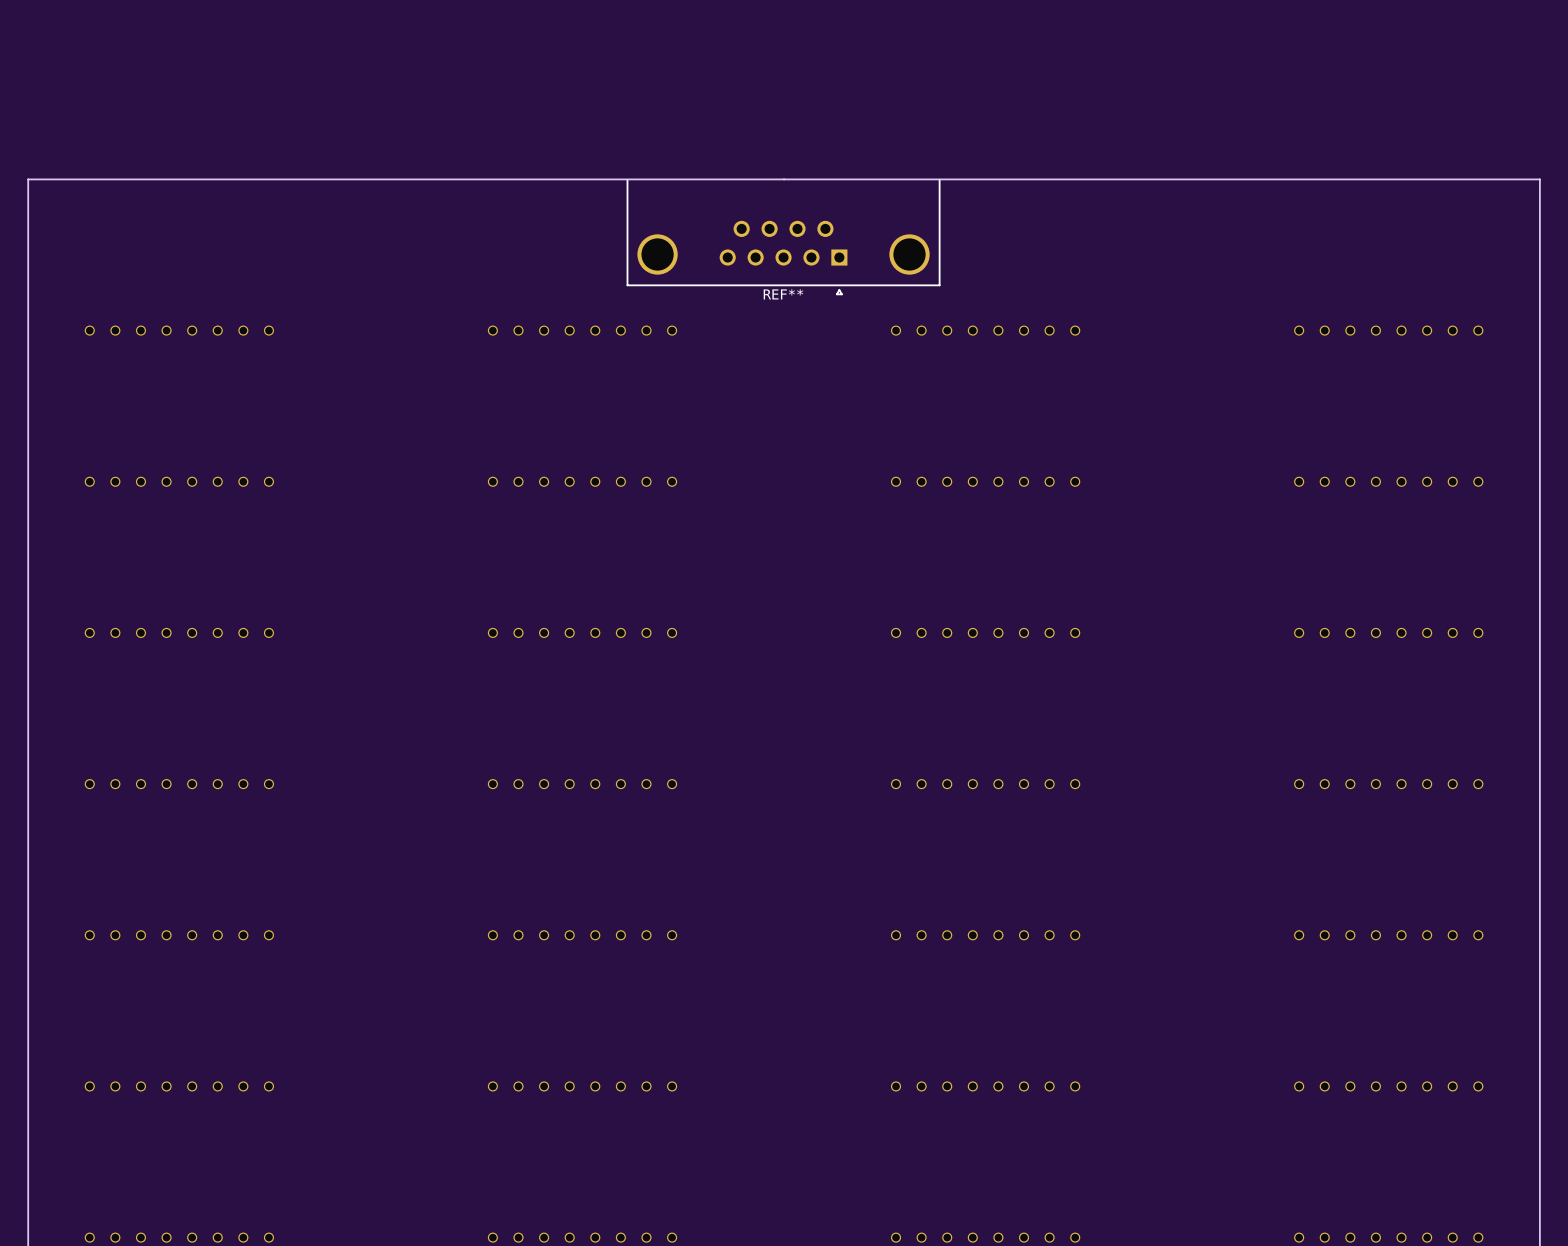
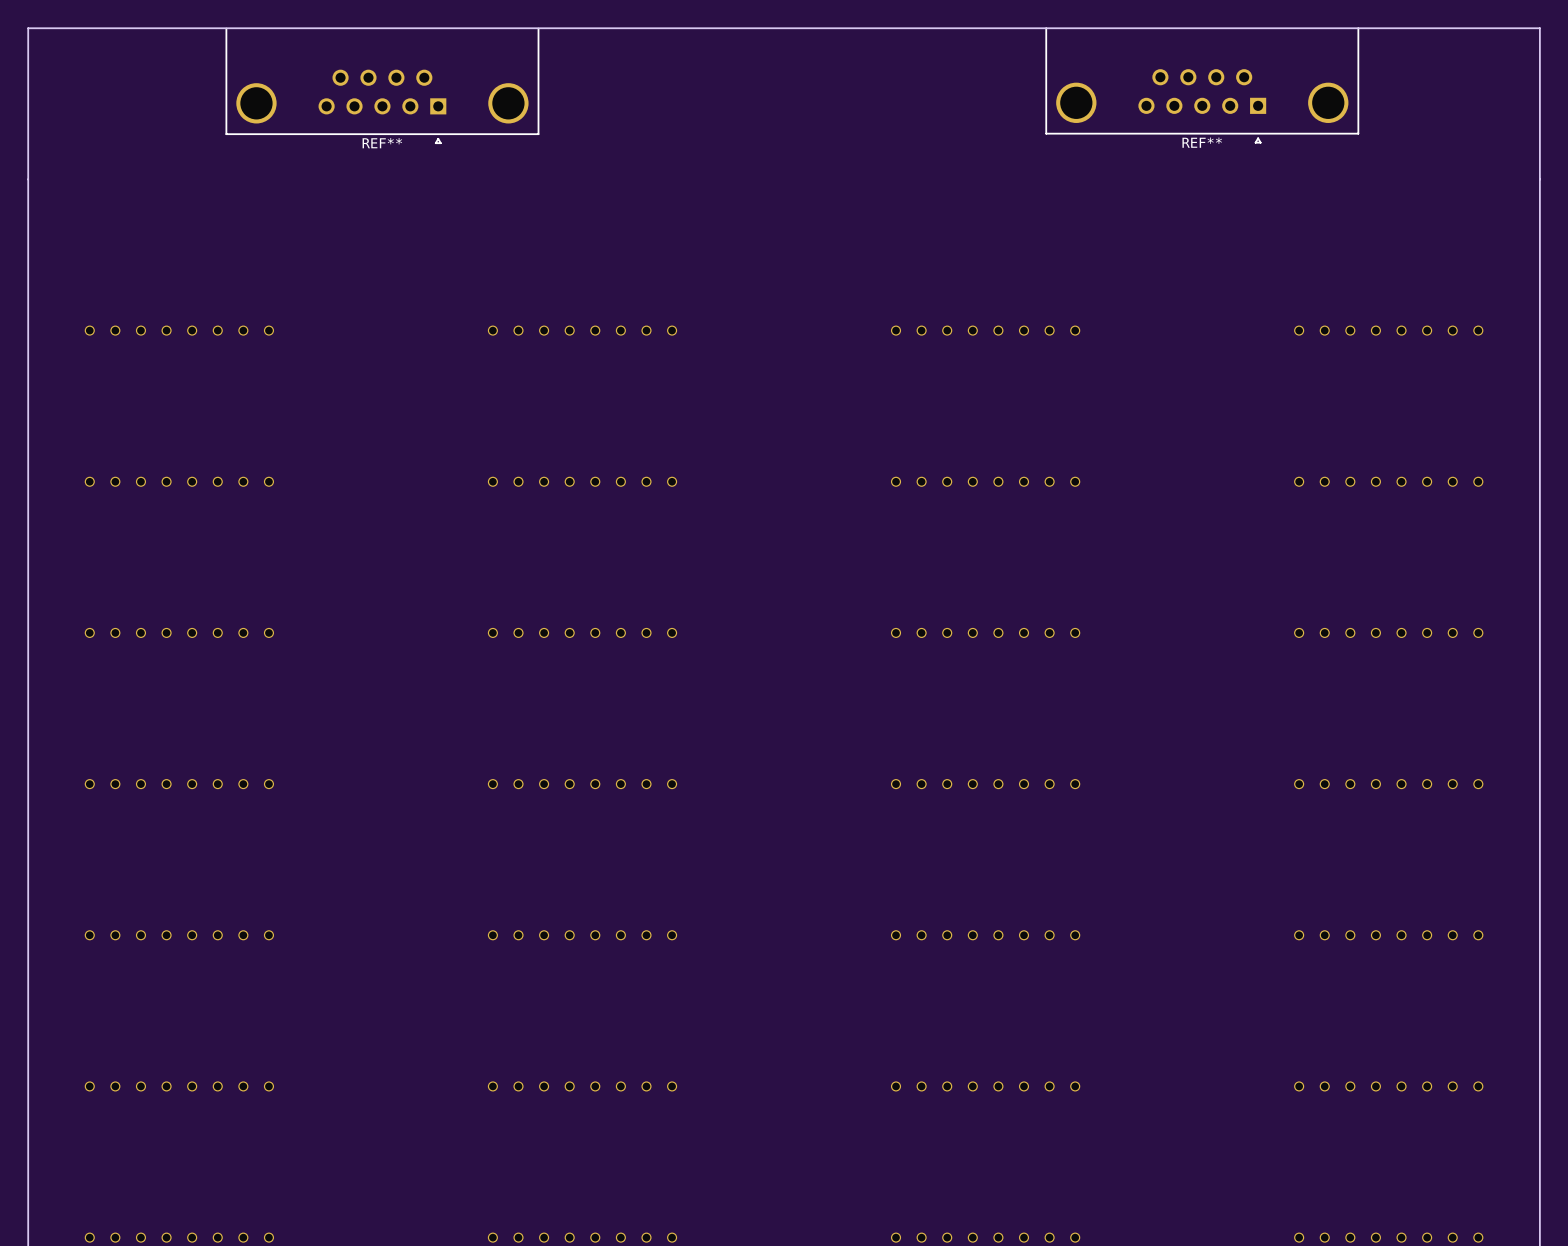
REF**: none -> (382, 85)
REF**: none -> (1202, 85)
board edge: (28, 179) (1539, 179) -> (28, 179) (28, 28) (1539, 28) (1539, 179)
REF**: (783, 237) -> none

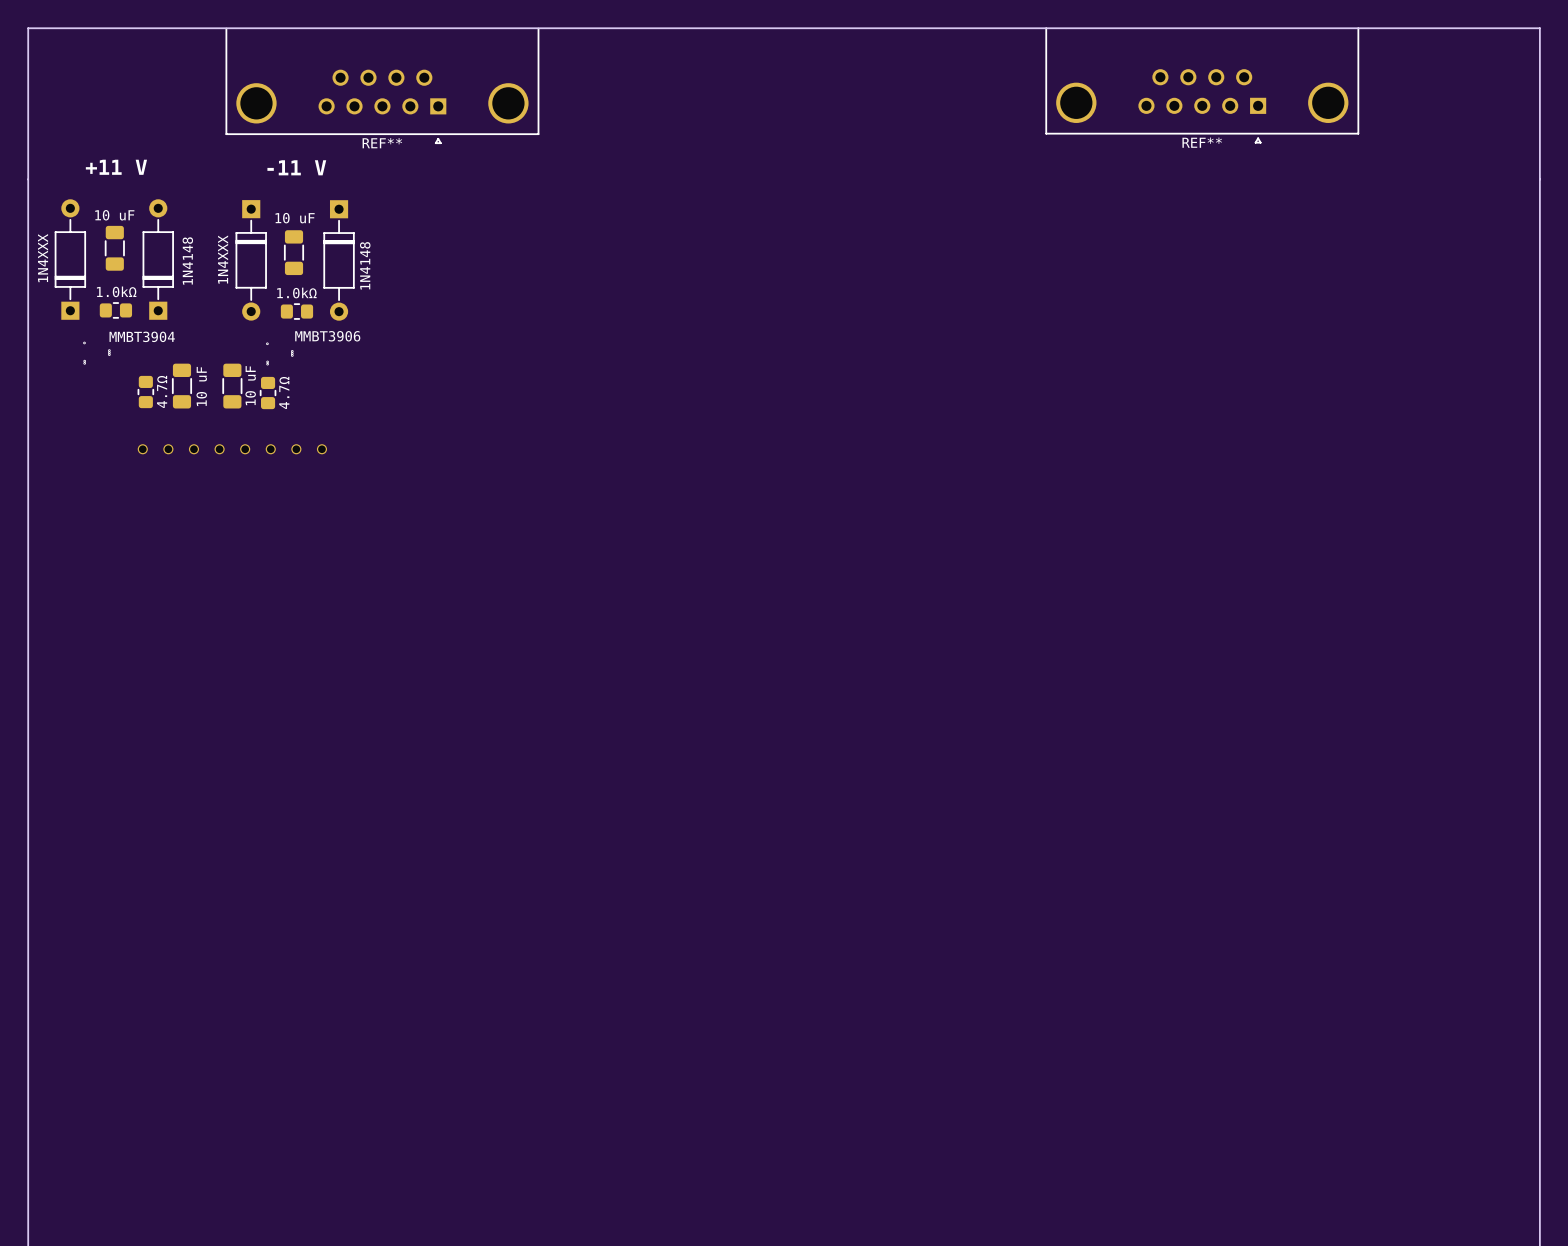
text: none -> +11 V (116, 167)
text: none -> -11 V (296, 167)
10 uF: none -> (114, 248)
10 uF: none -> (294, 252)
1N4XXX: none -> (70, 259)
1N4148: none -> (158, 259)
1N4XXX: none -> (251, 260)
1N4148: none -> (339, 260)
1.0kΩ: none -> (115, 310)
1.0kΩ: none -> (296, 311)
part: (179, 330) -> none
part: (582, 330) -> none
part: (985, 330) -> none
part: (1388, 330) -> none
MMBT3904: none -> (96, 353)
MMBT3906: none -> (279, 353)
10 uF: none -> (181, 386)
10 uF: none -> (232, 386)
4.7Ω: none -> (145, 392)
4.7Ω: none -> (268, 393)
part position: (179, 481) -> (232, 449)
part: (582, 481) -> none
part: (985, 481) -> none
part: (1388, 481) -> none
part: (179, 632) -> none
part: (582, 632) -> none
part: (985, 632) -> none
part: (1388, 632) -> none
part: (179, 784) -> none
part: (582, 784) -> none
part: (985, 784) -> none
part: (1388, 784) -> none
part: (179, 935) -> none
part: (582, 935) -> none
part: (985, 935) -> none
part: (1388, 935) -> none
part: (179, 1086) -> none
part: (582, 1086) -> none
part: (985, 1086) -> none
part: (1388, 1086) -> none
part: (179, 1237) -> none
part: (582, 1237) -> none
part: (985, 1237) -> none
part: (1388, 1237) -> none

